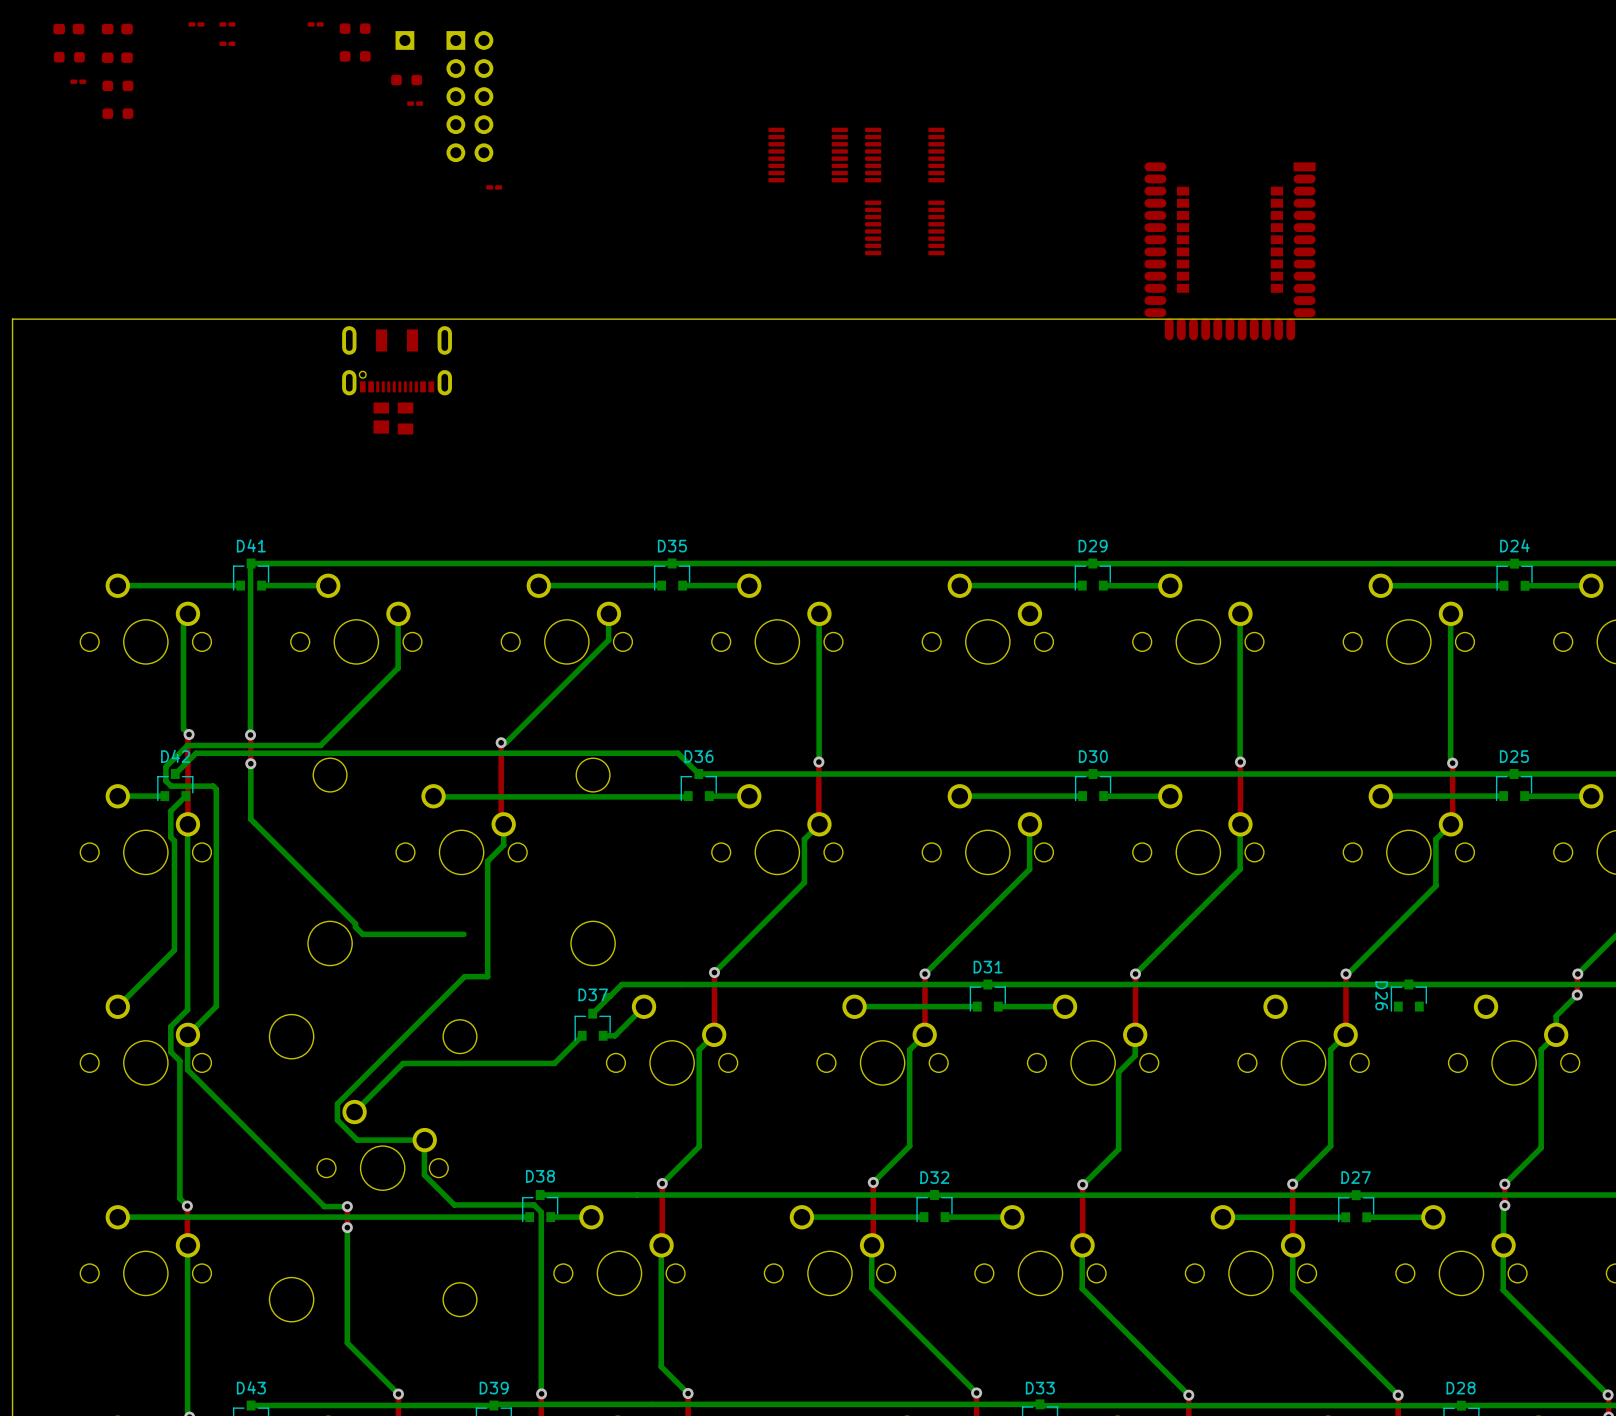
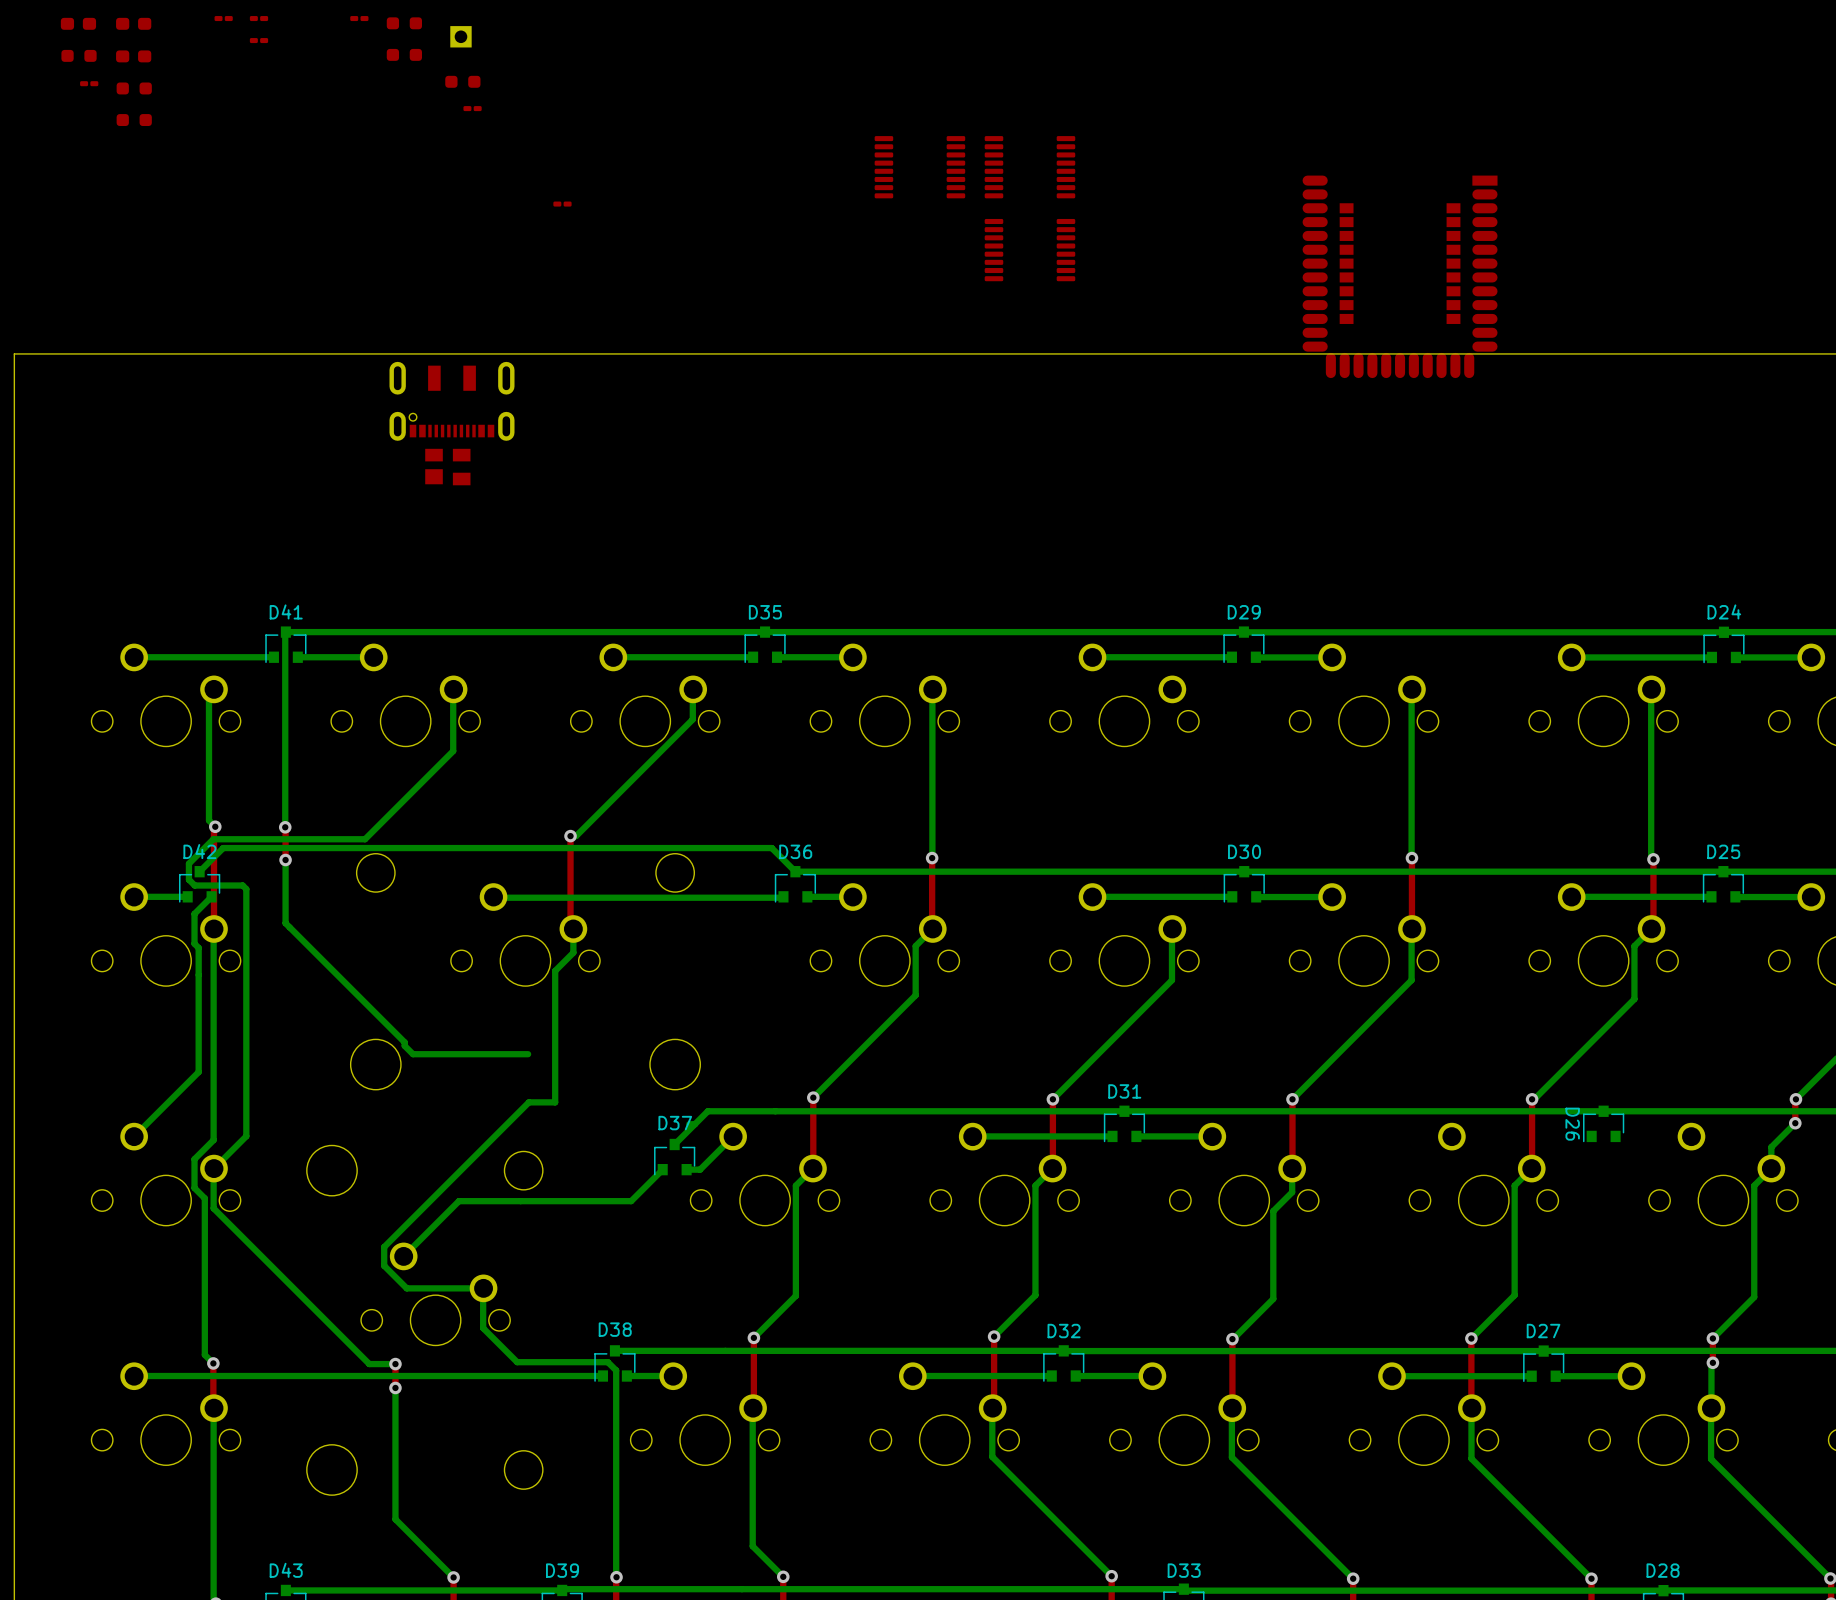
part: (469, 96) -> none

